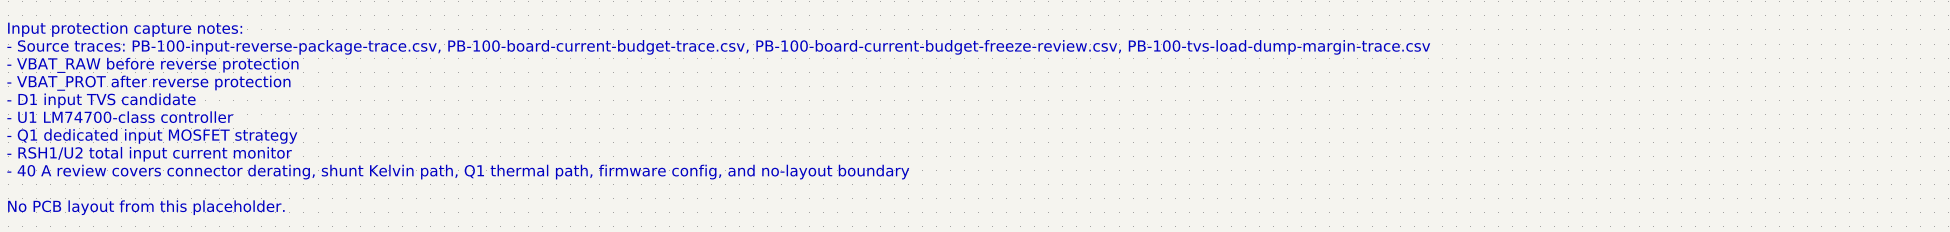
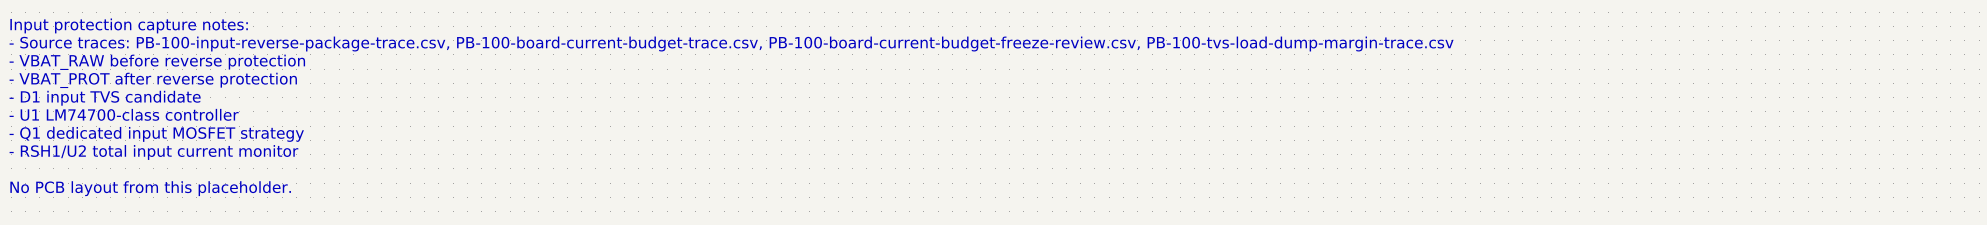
text: - 40 A review covers connector derating, shunt Kelvin path, Q1 thermal path, firmware config, and no-layout boundary (458, 172) -> none
text position: No PCB layout from this placeholder. (146, 207) -> No PCB layout from this placeholder. (150, 188)

